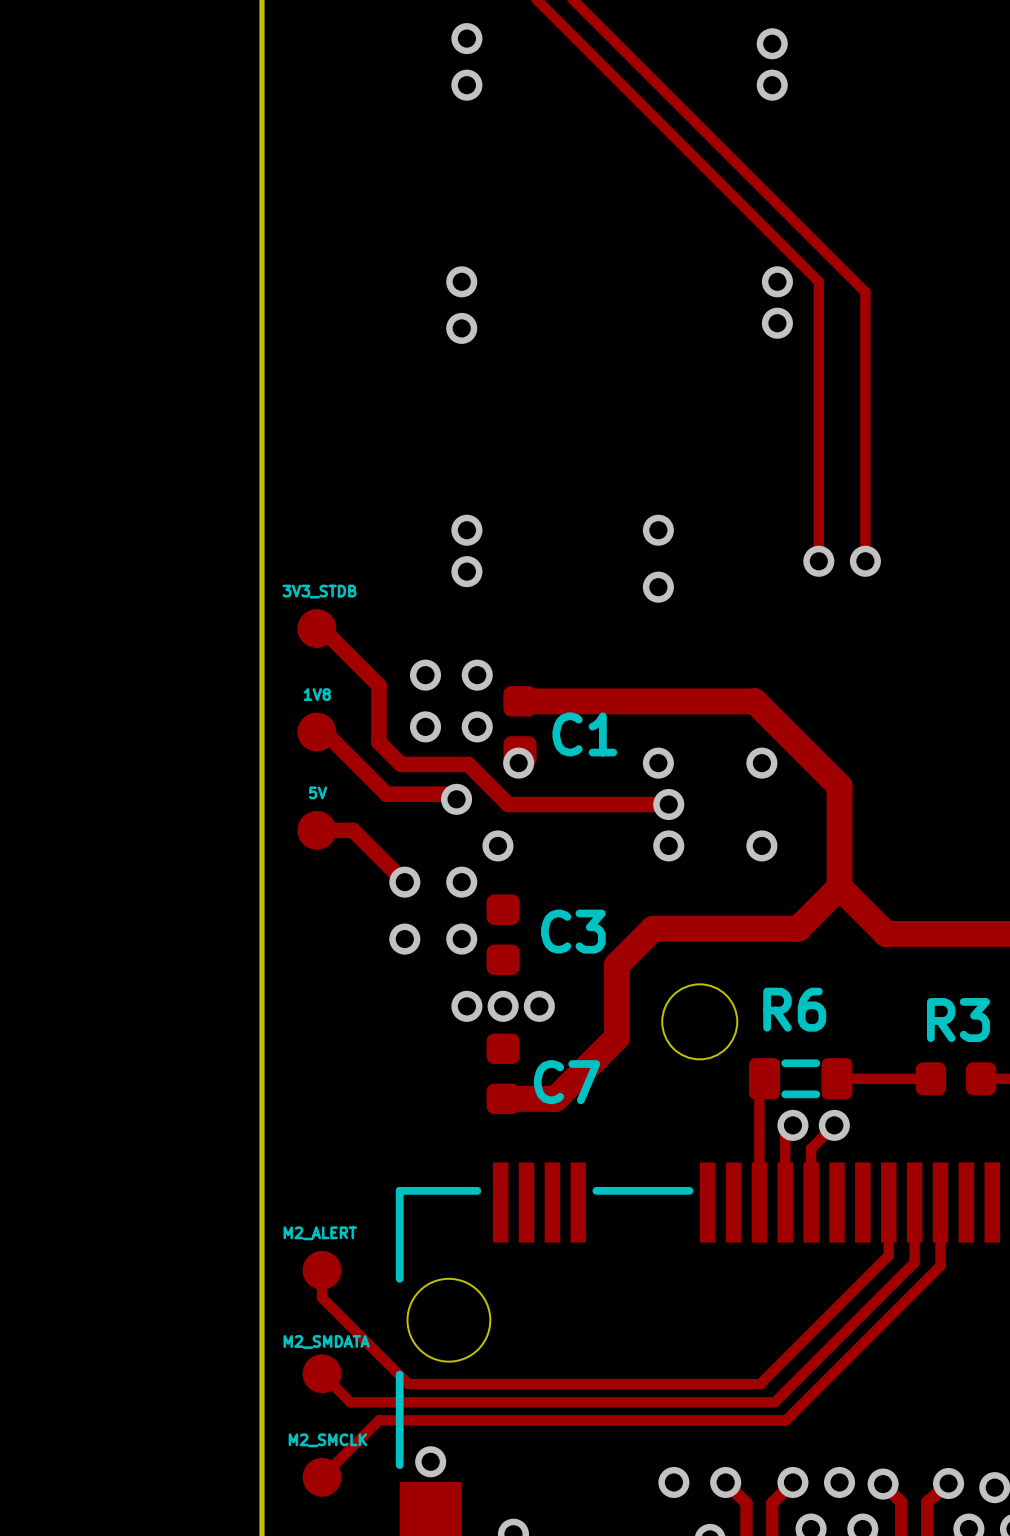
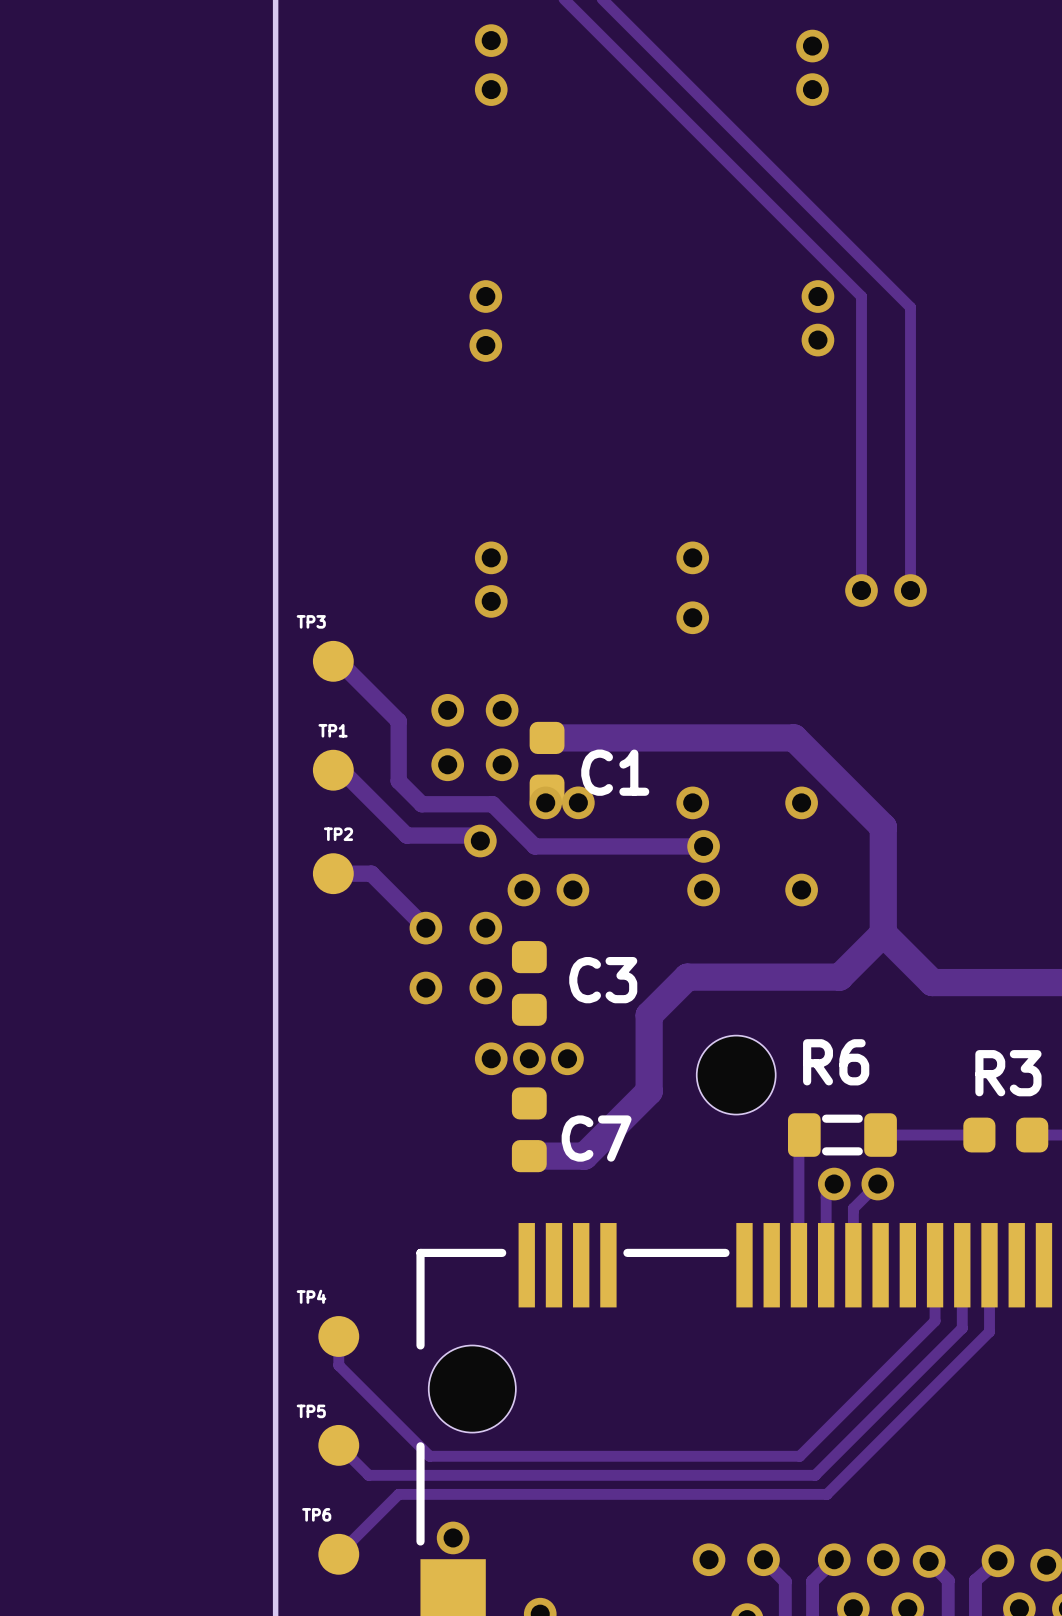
3V3_STDB name: 3V3_STDB (319, 591) -> TP3 (311, 621)
1V8 name: 1V8 (317, 694) -> TP1 (333, 730)
via: none -> (578, 802)
5V name: 5V (318, 792) -> TP2 (338, 834)
via: none -> (572, 890)
M2_ALERT name: M2_ALERT (320, 1233) -> TP4 (311, 1296)
M2_SMDATA name: M2_SMDATA (326, 1341) -> TP5 (311, 1411)
M2_SMCLK name: M2_SMCLK (327, 1440) -> TP6 (316, 1514)

